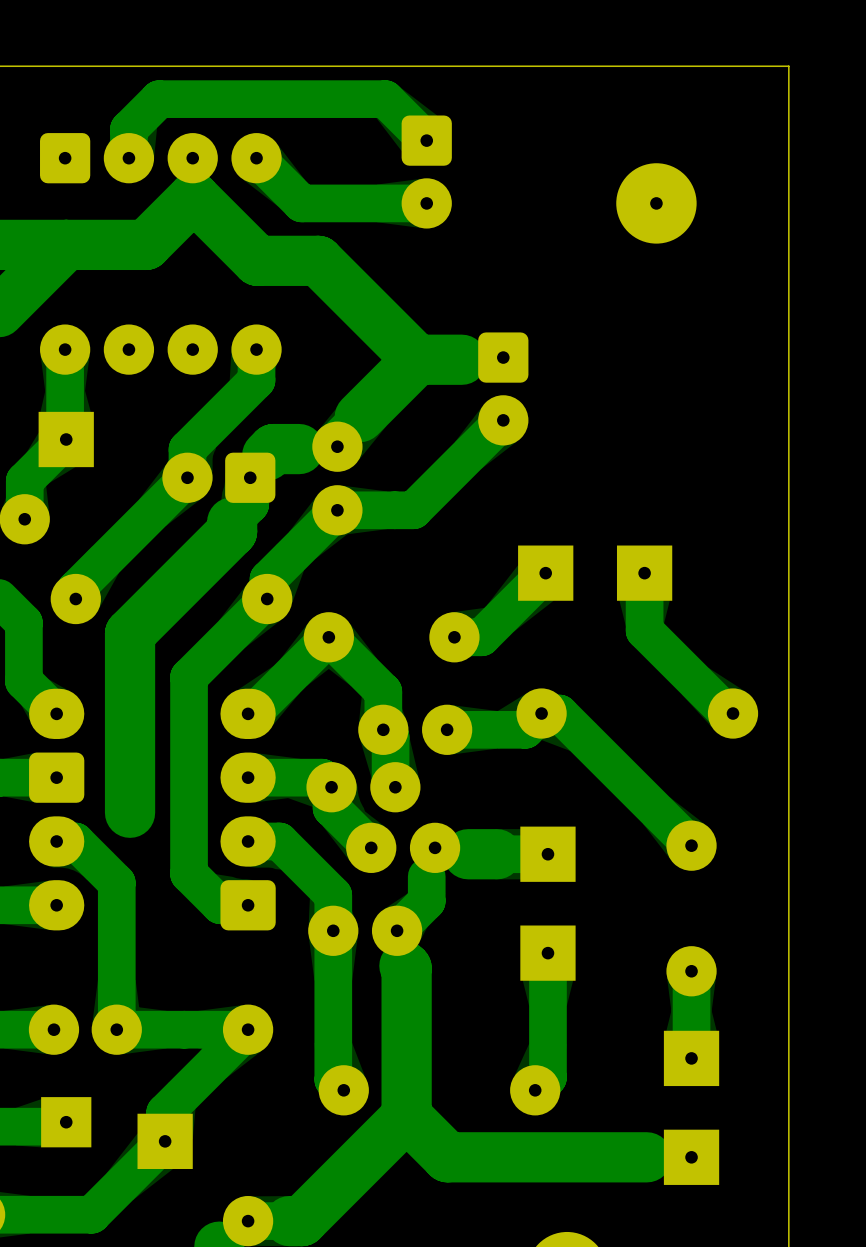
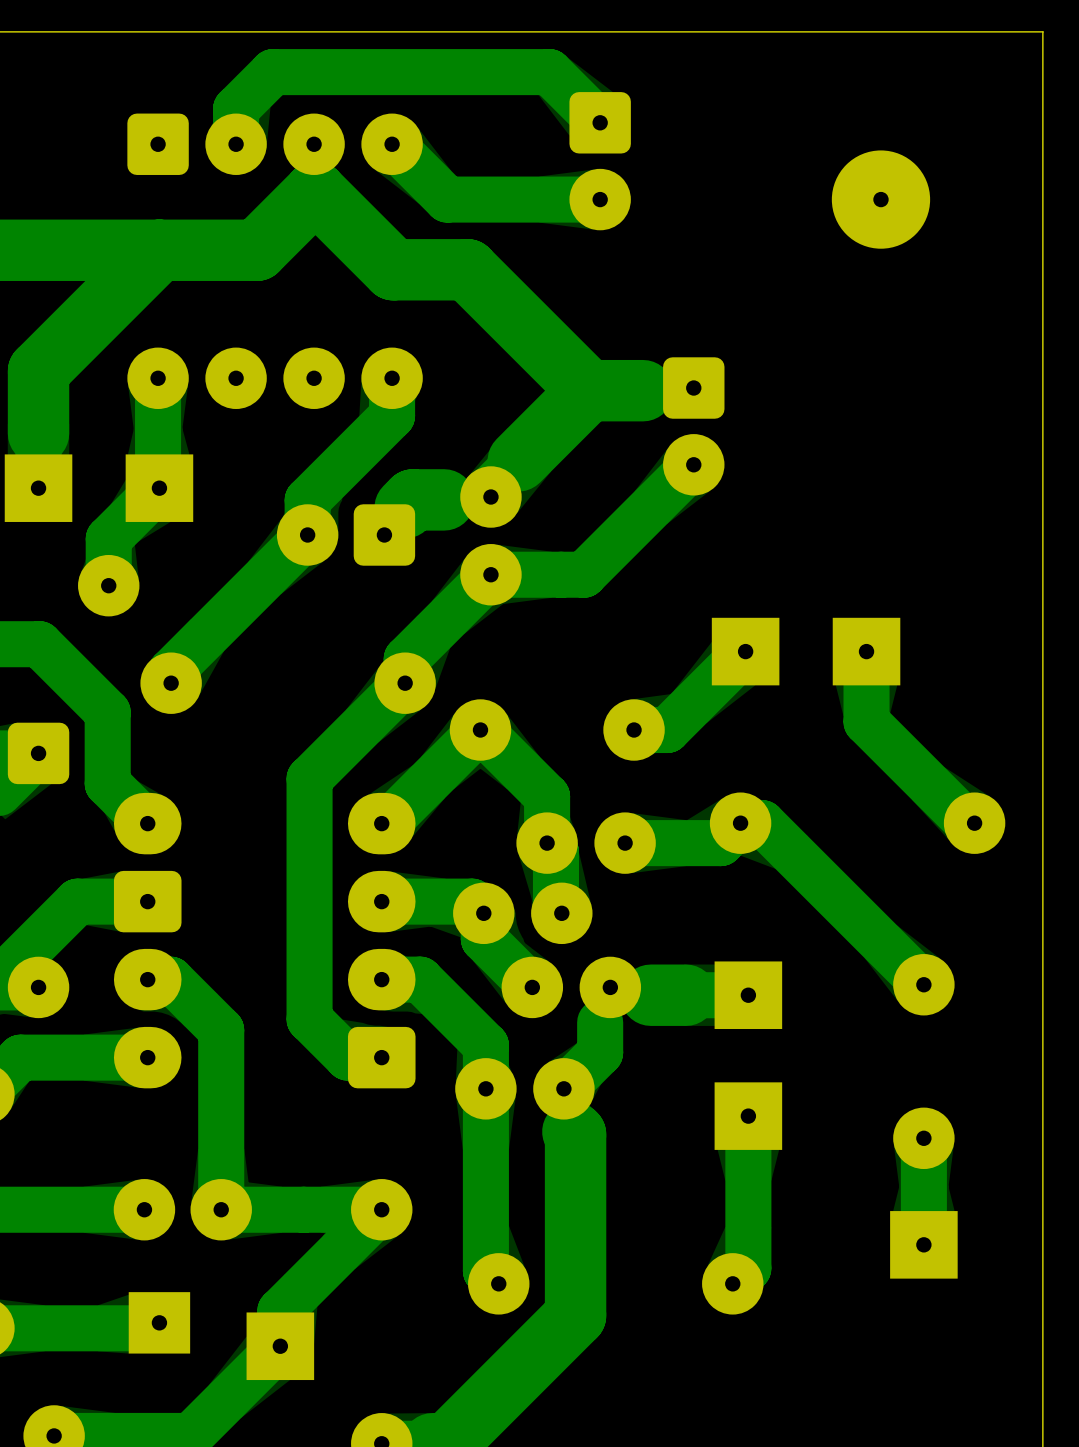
track: (250, 477) (250, 504) (232, 522) (232, 531) (130, 633) (130, 812) -> none
track: (406, 1116) (447, 1157) (646, 1157) -> none
part: (691, 1157) -> none

